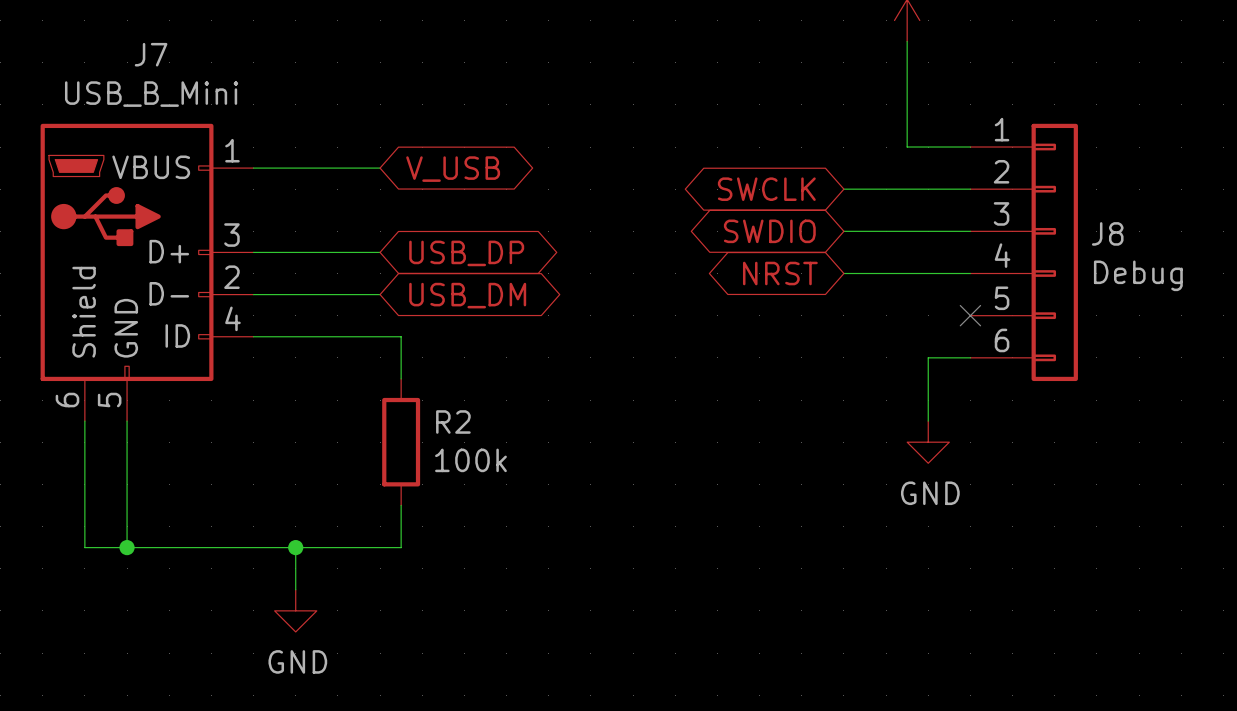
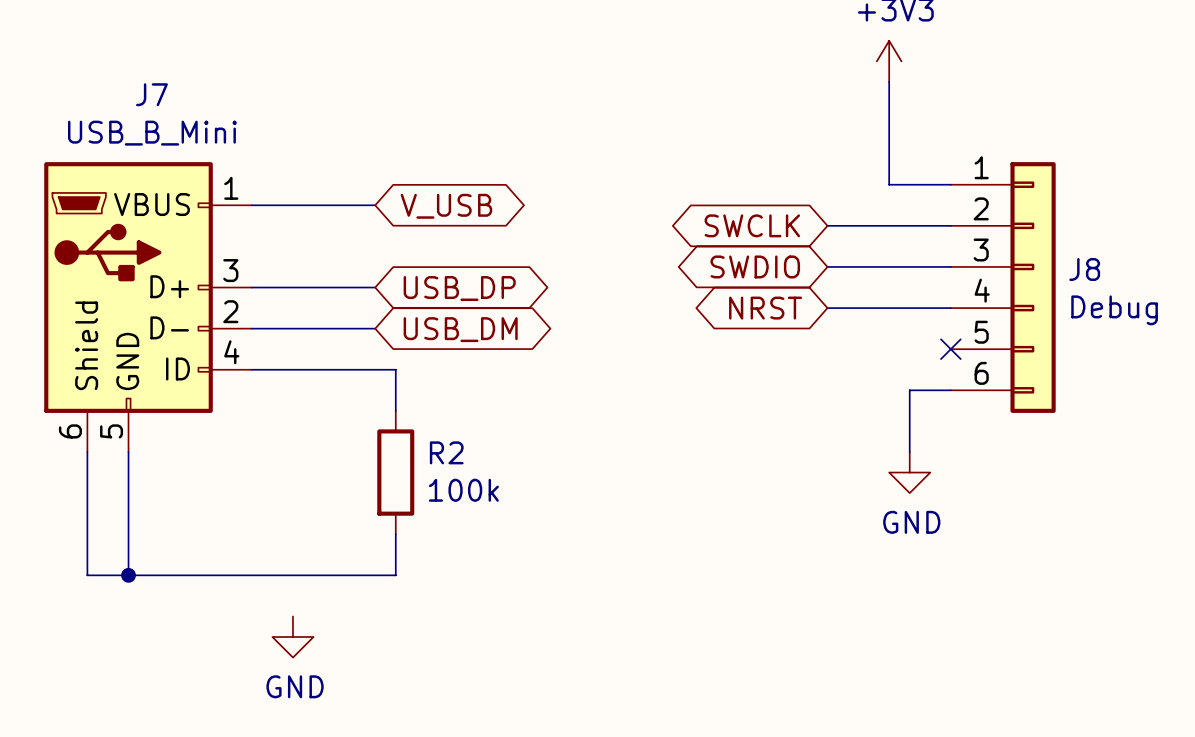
wire: (295, 547) (295, 589) -> none
junction: (295, 547) -> none

